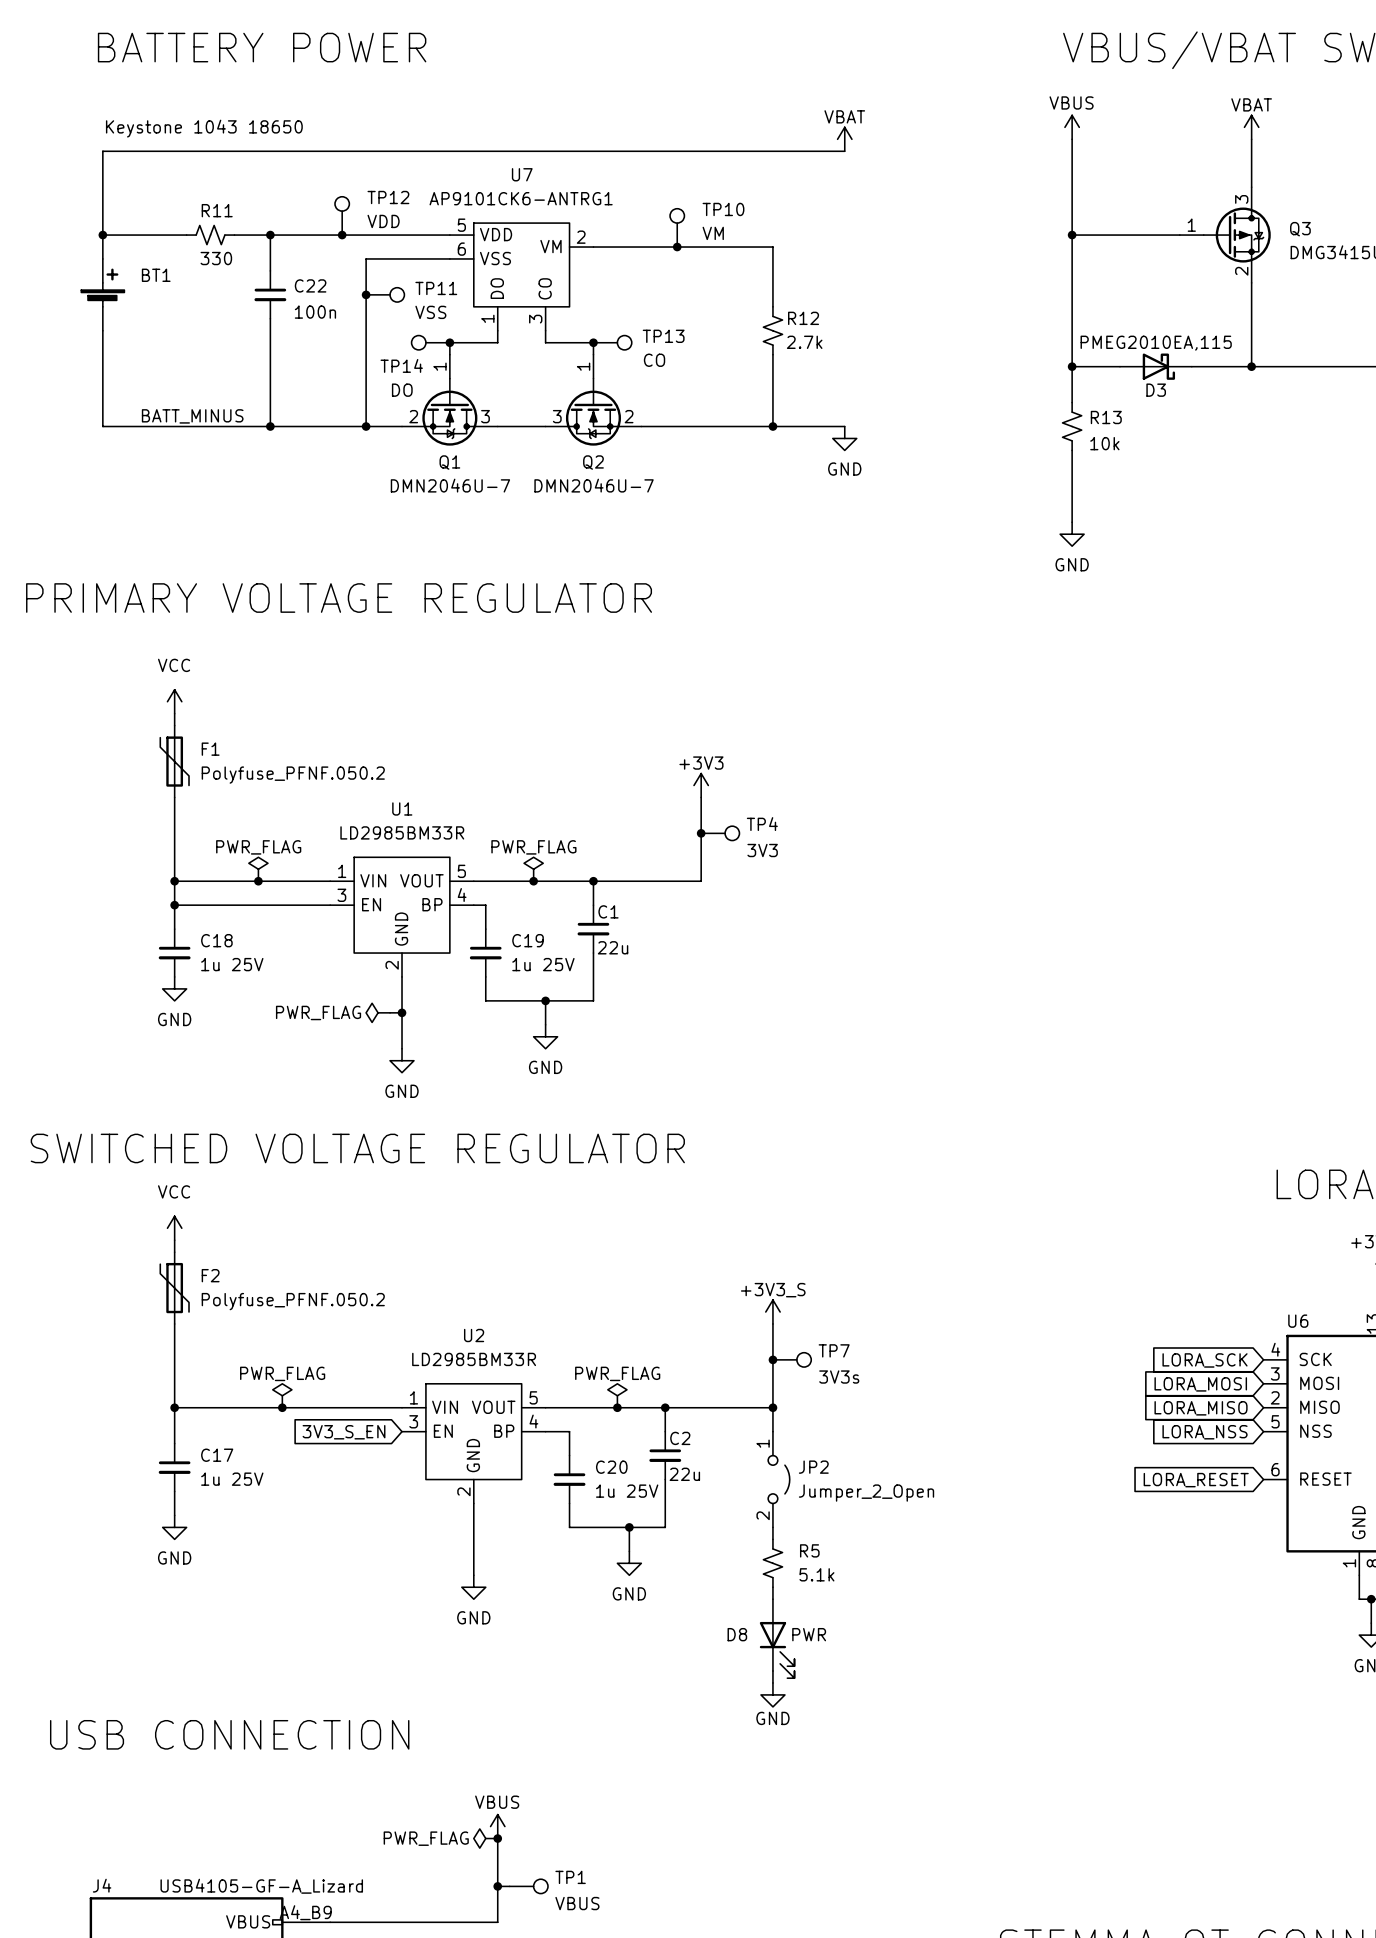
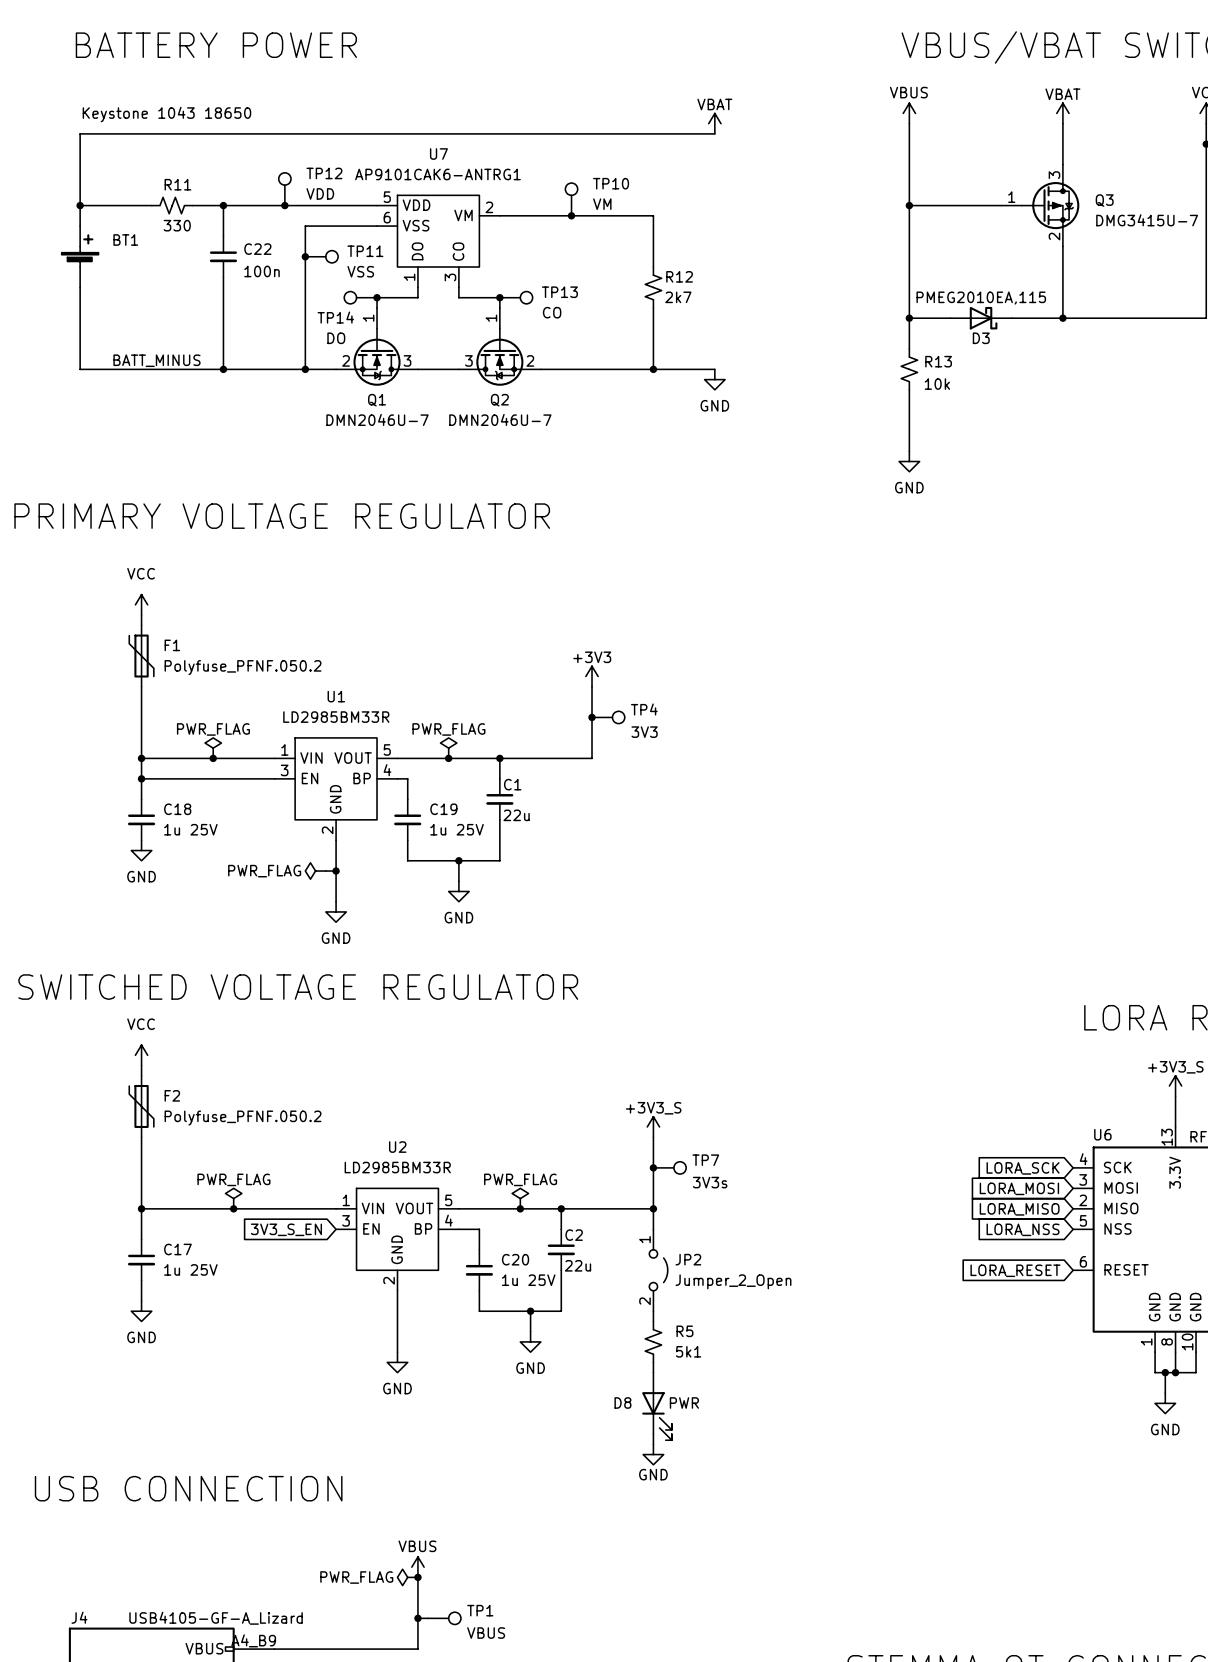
U7 value: AP9101CK6-ANTRG1 (521, 198) -> AP9101CAK6-ANTRG1 (437, 174)
R12 value: 2.7k (804, 342) -> 2k7 (678, 297)
R5 value: 5.1k (816, 1574) -> 5k1 (688, 1351)

